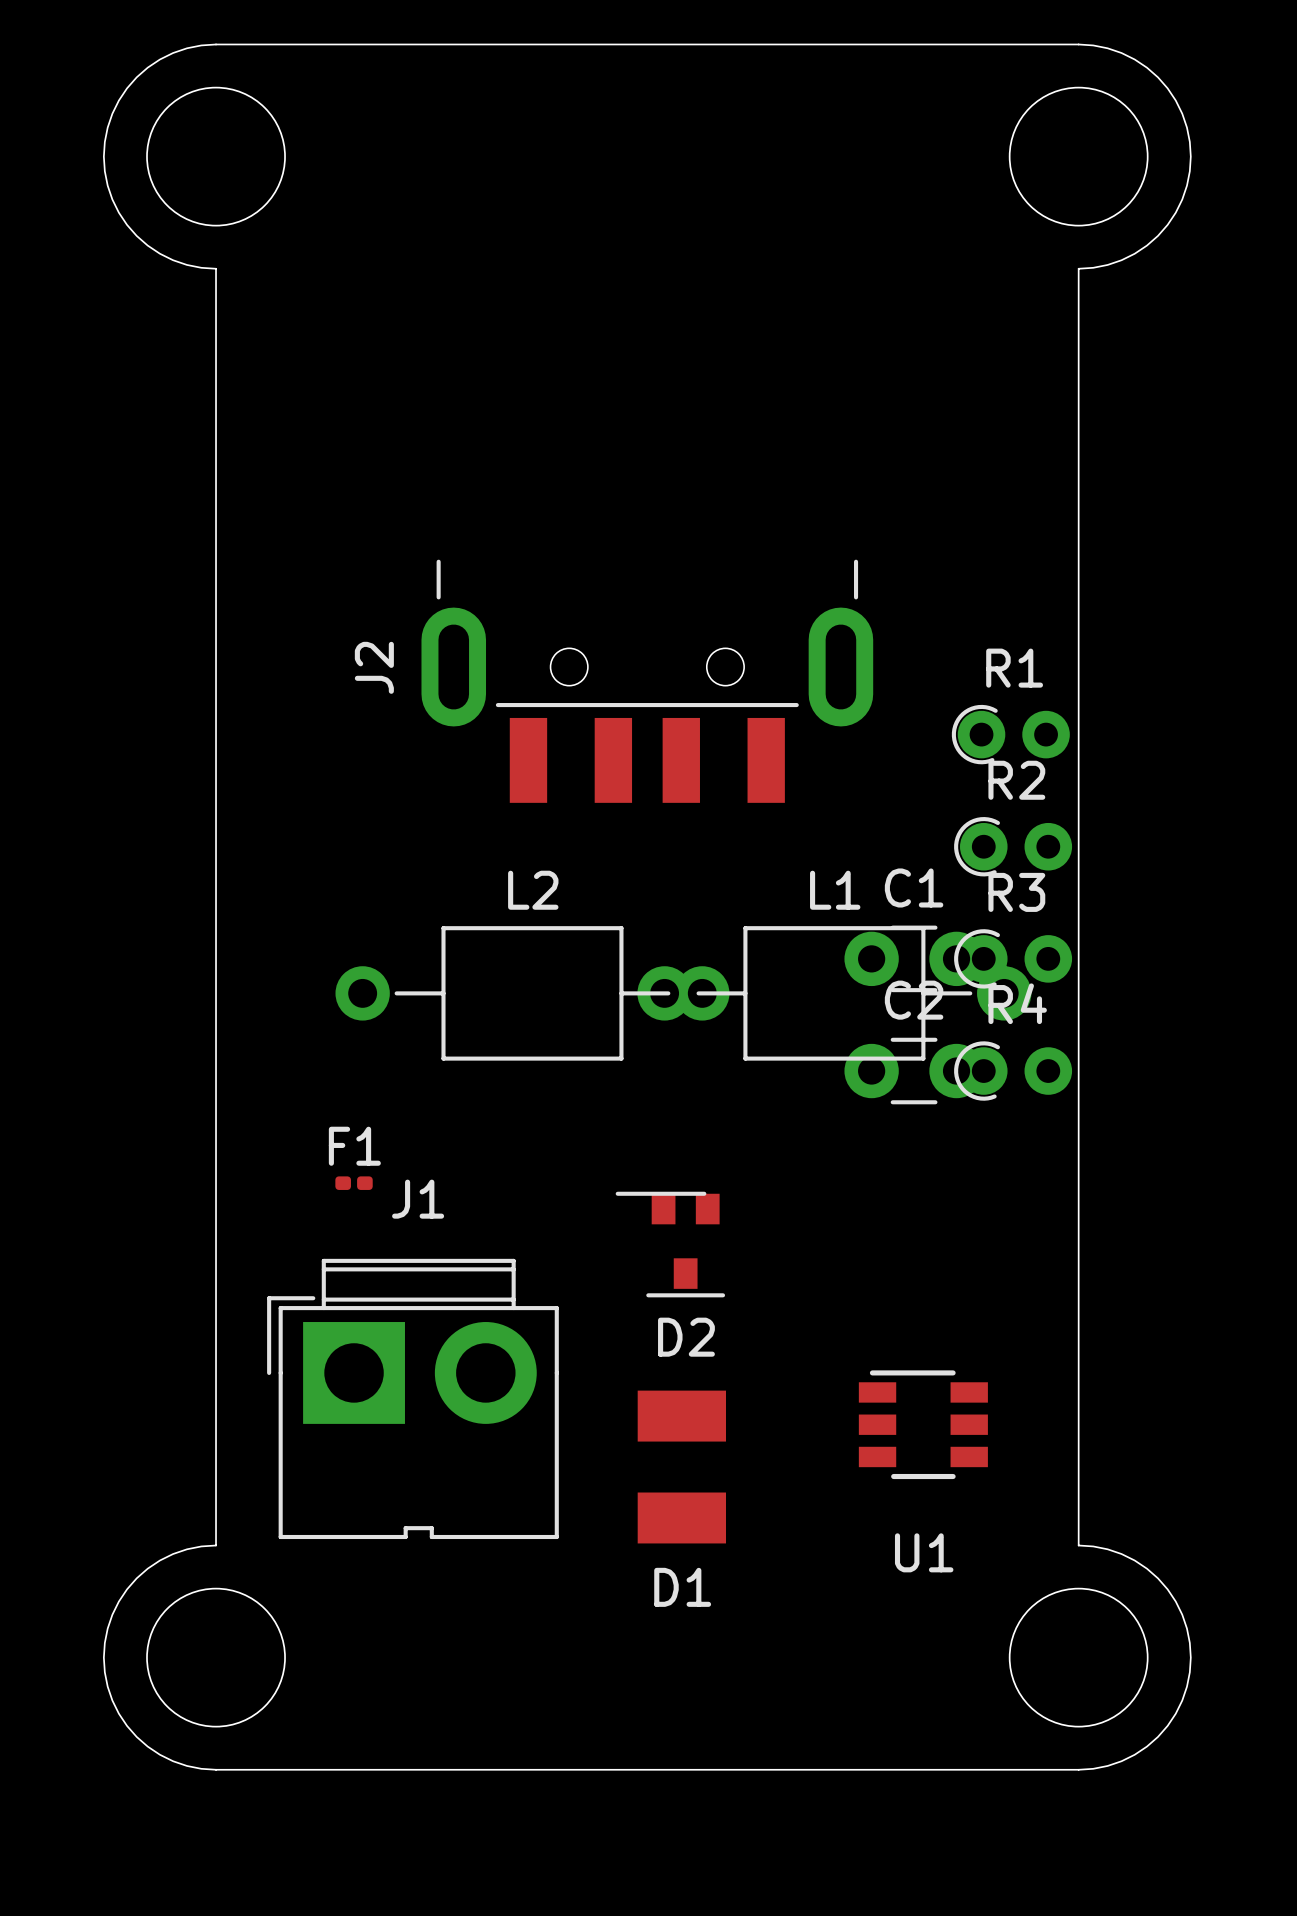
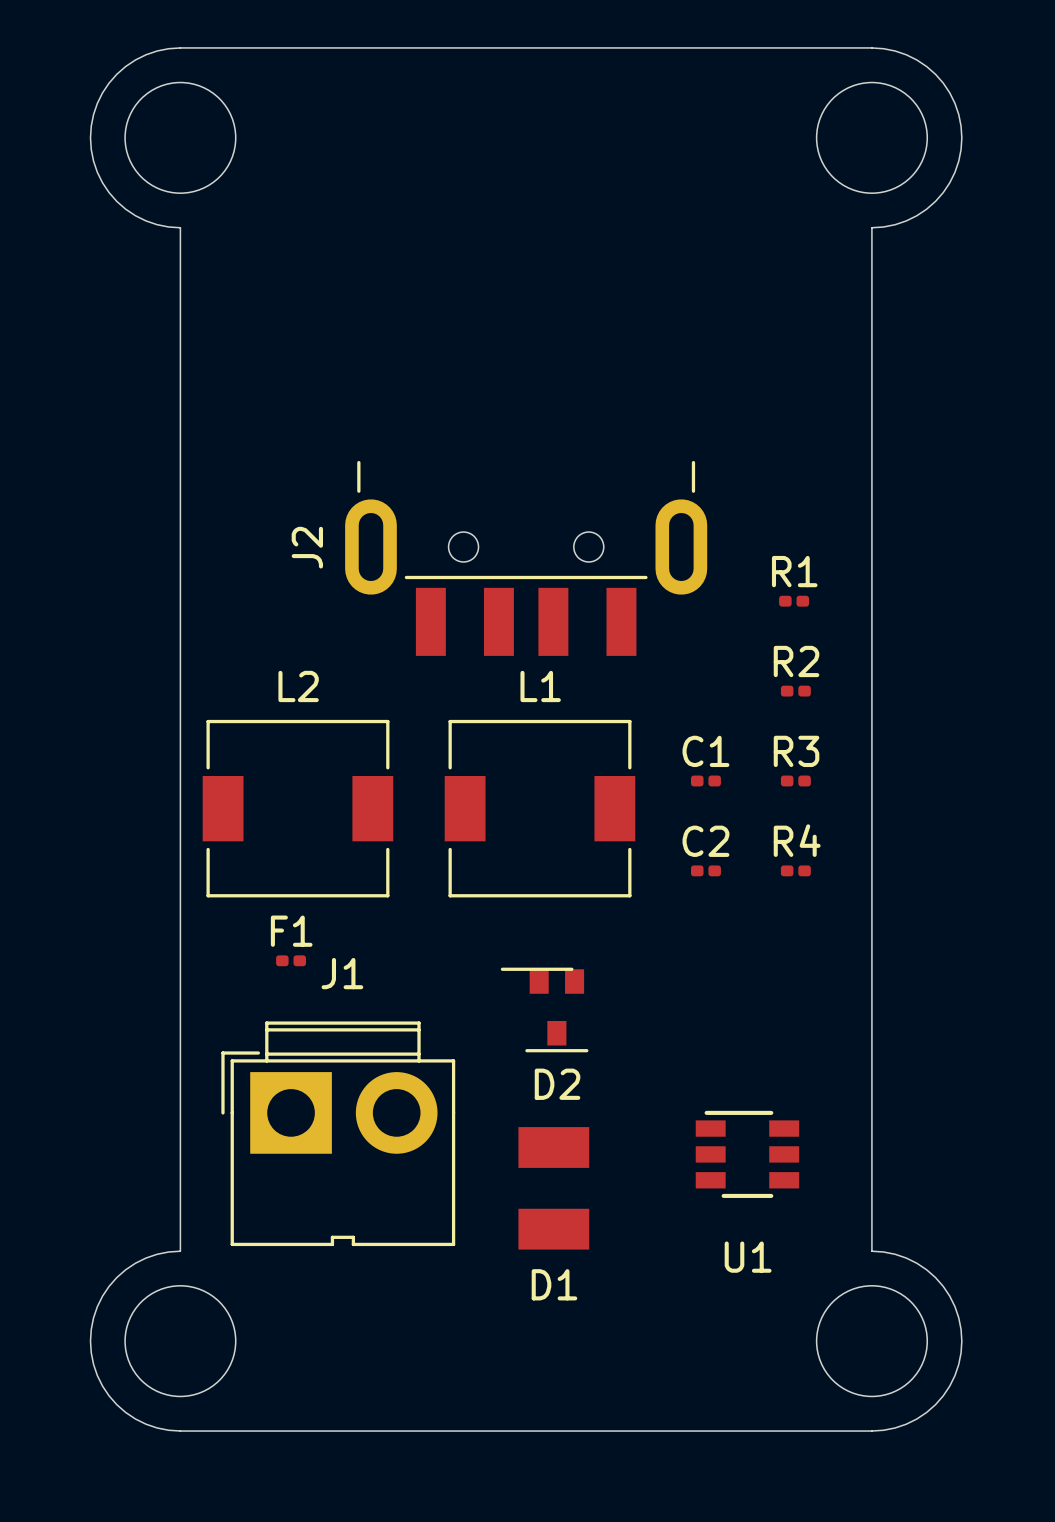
R1 footprint: [951, 704, 1070, 765] -> [779, 595, 810, 607]
R2 footprint: [954, 817, 1073, 877] -> [780, 685, 811, 697]
C1 footprint: [844, 925, 984, 993] -> [690, 775, 721, 787]
L2 footprint: [335, 926, 730, 1061] -> [202, 719, 394, 898]
L1 footprint: [637, 926, 1032, 1061] -> [444, 719, 636, 898]
R3 footprint: [954, 929, 1073, 989] -> [780, 775, 811, 787]
C2 footprint: [844, 1037, 984, 1105] -> [690, 865, 721, 877]
R4 footprint: [954, 1041, 1073, 1101] -> [780, 865, 811, 877]

